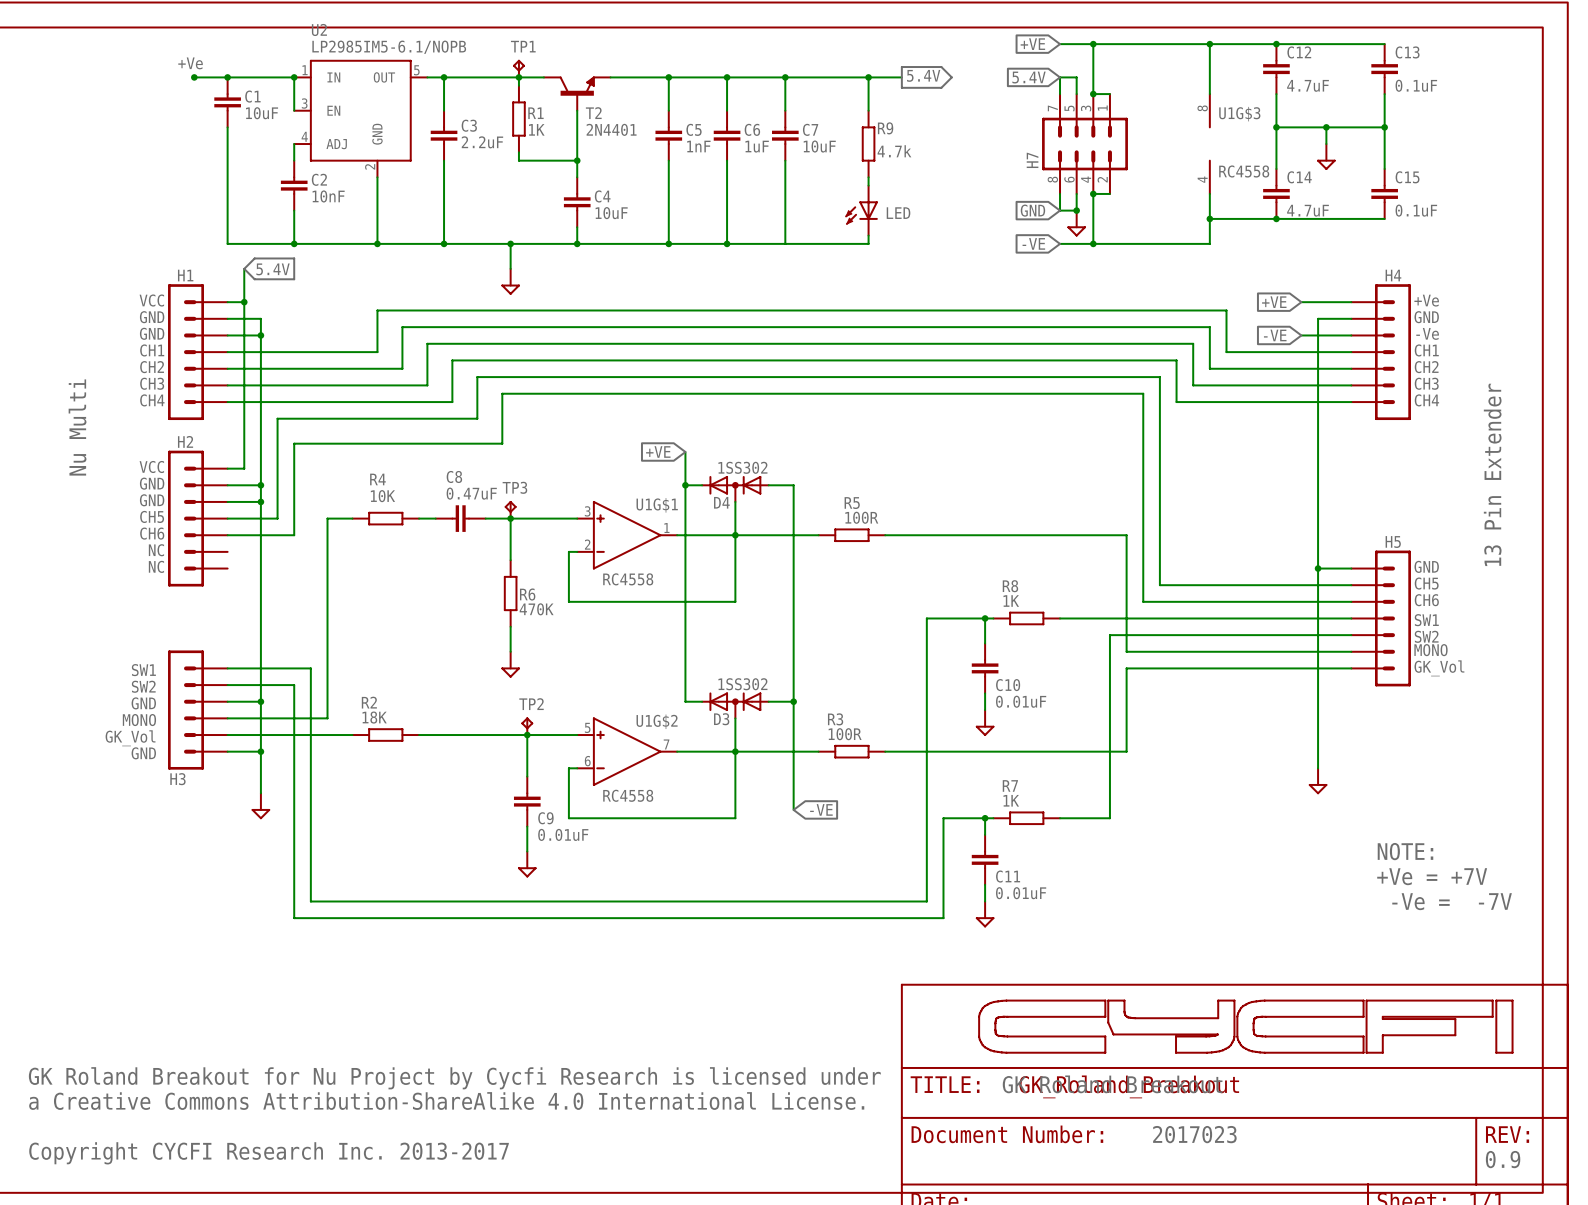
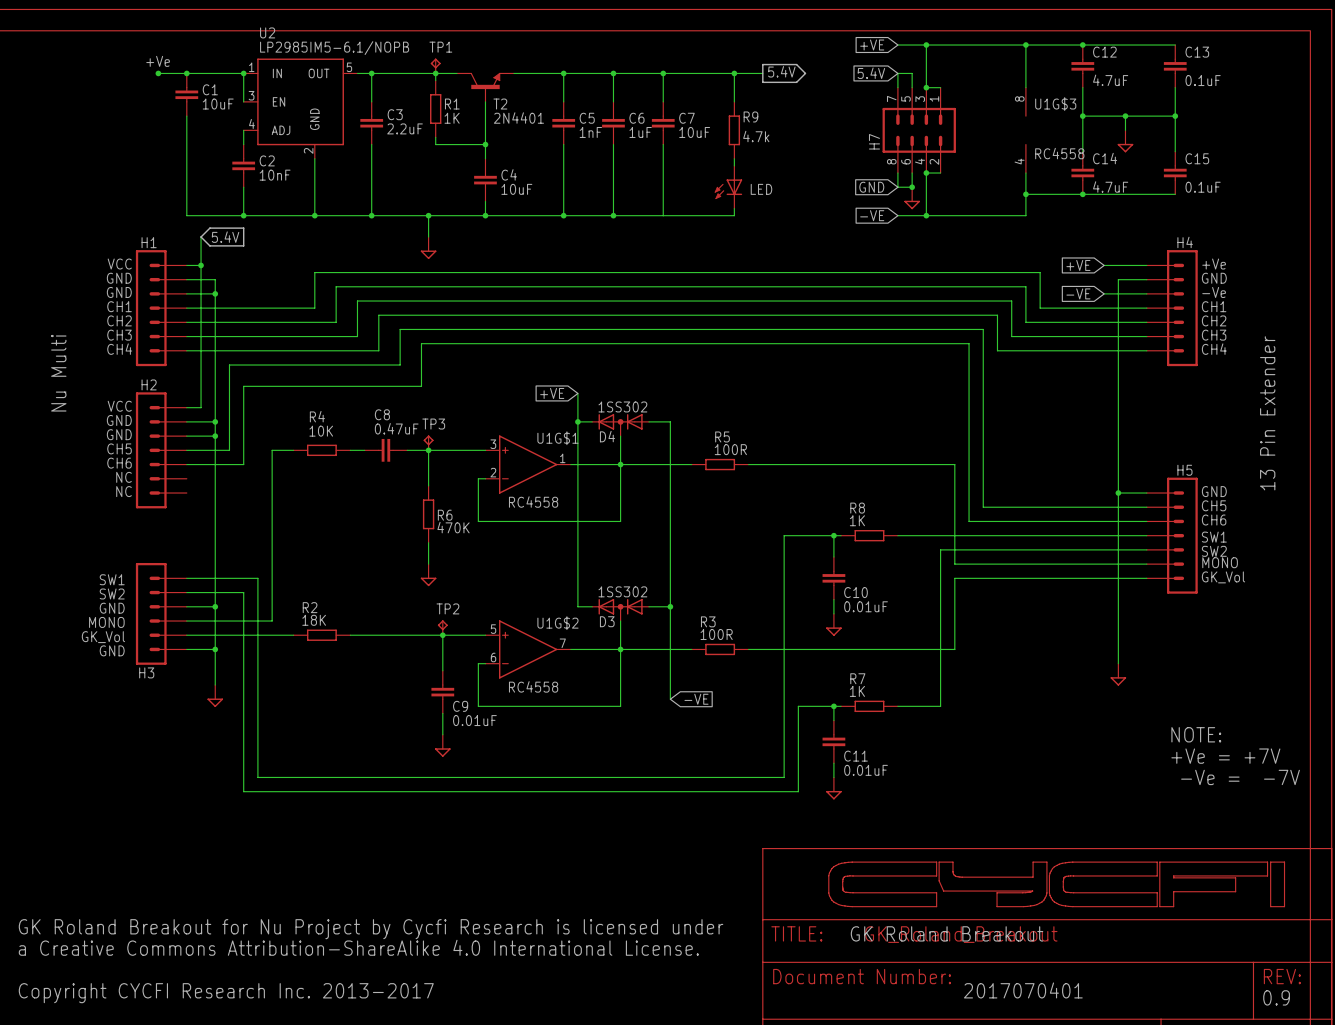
text: 2017023 (1194, 1134) -> none
text: none -> 2017070401 (1023, 990)

